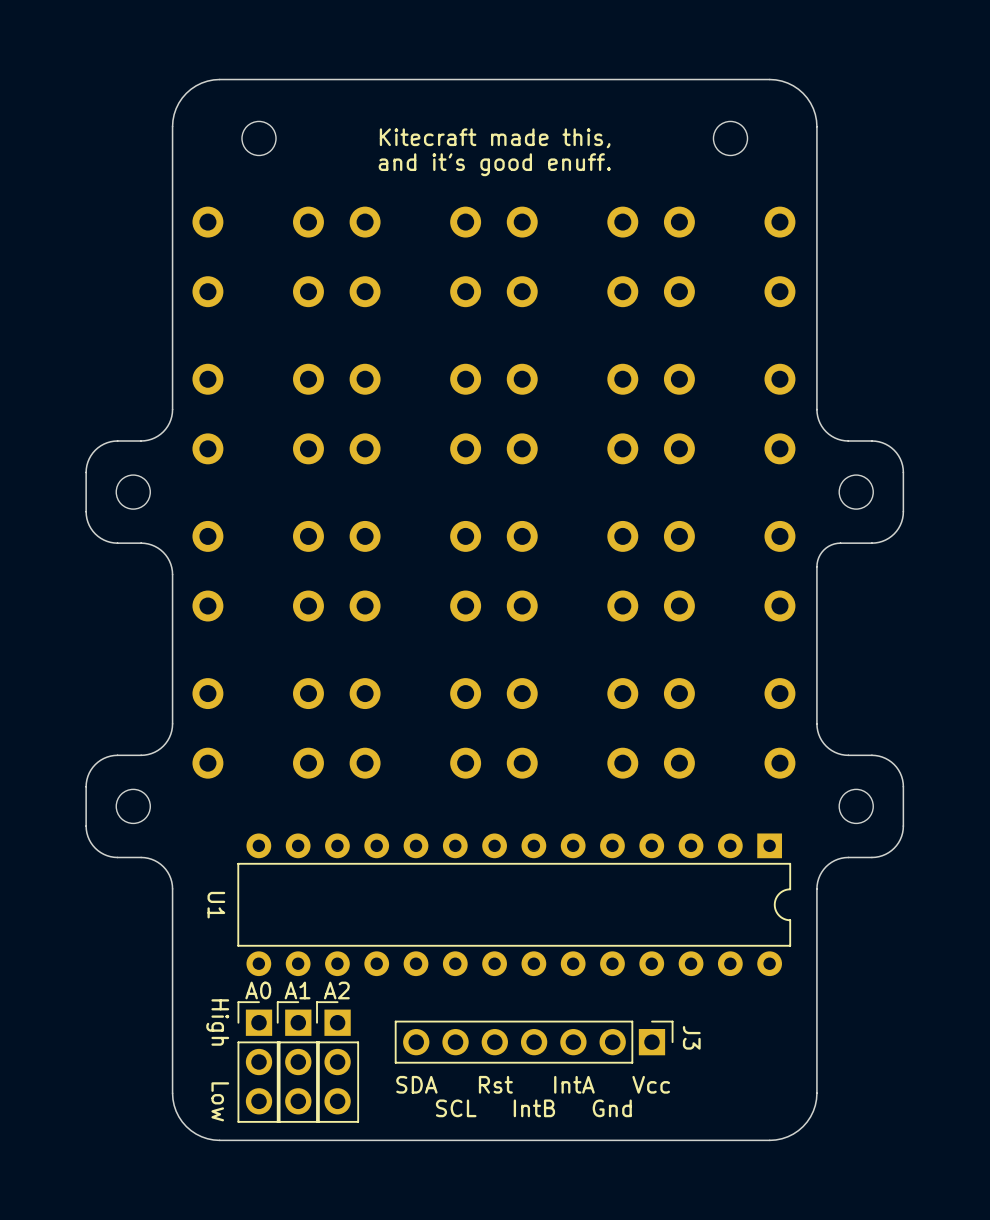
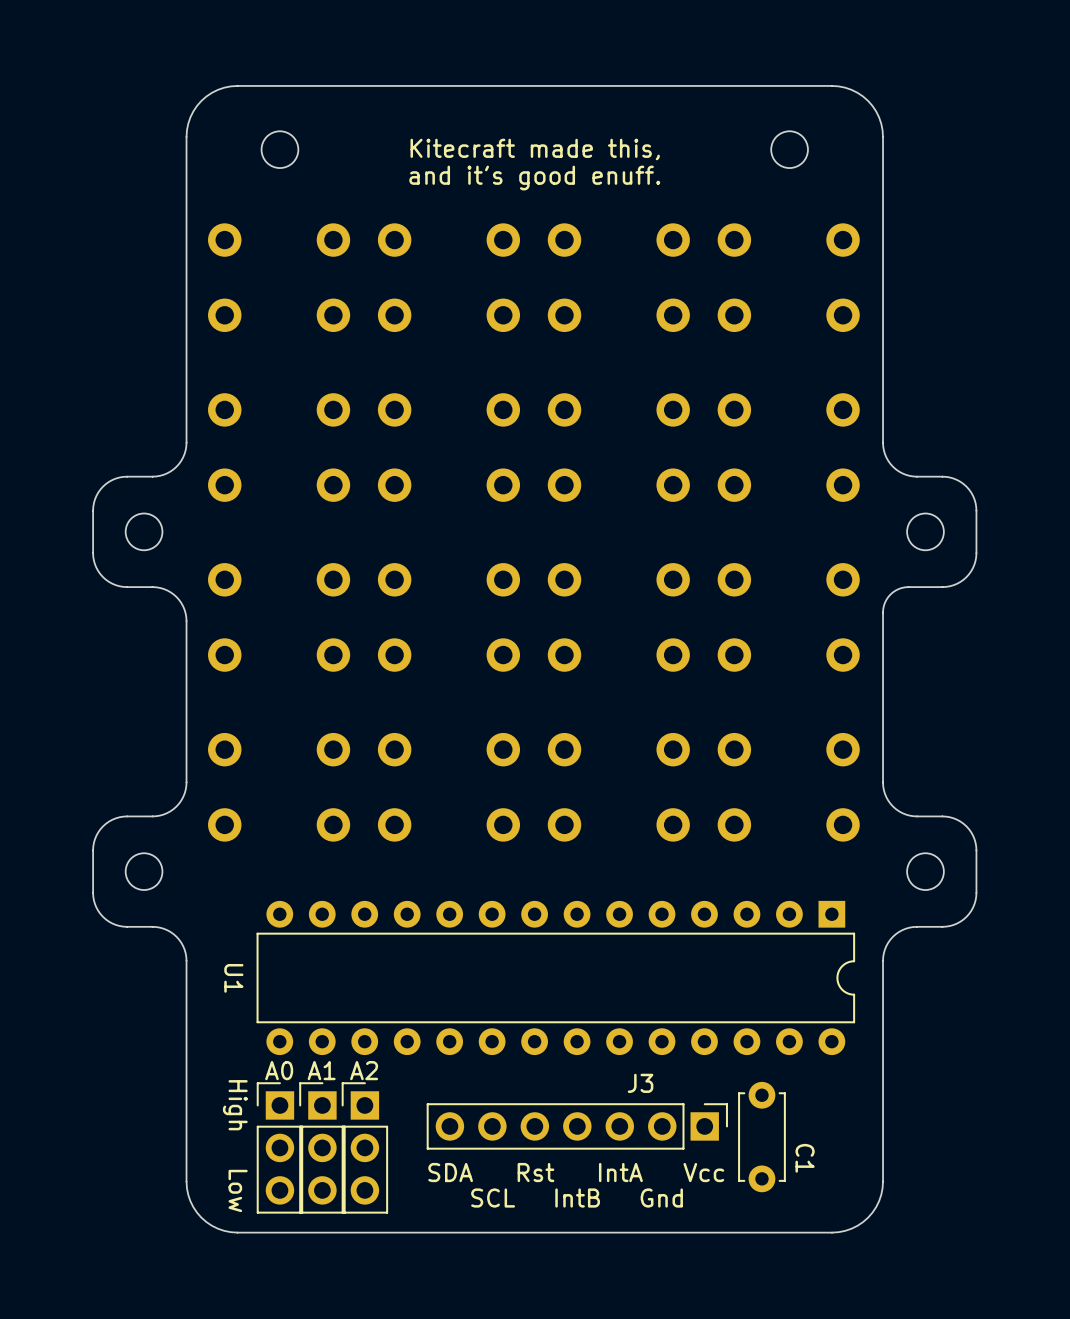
J3 name rotation: 0° (691, 1037) -> 90° counterclockwise (640, 1083)
J3 name position: J3 (691, 1037) -> J3 (640, 1083)
C1: none -> (761, 1137)

